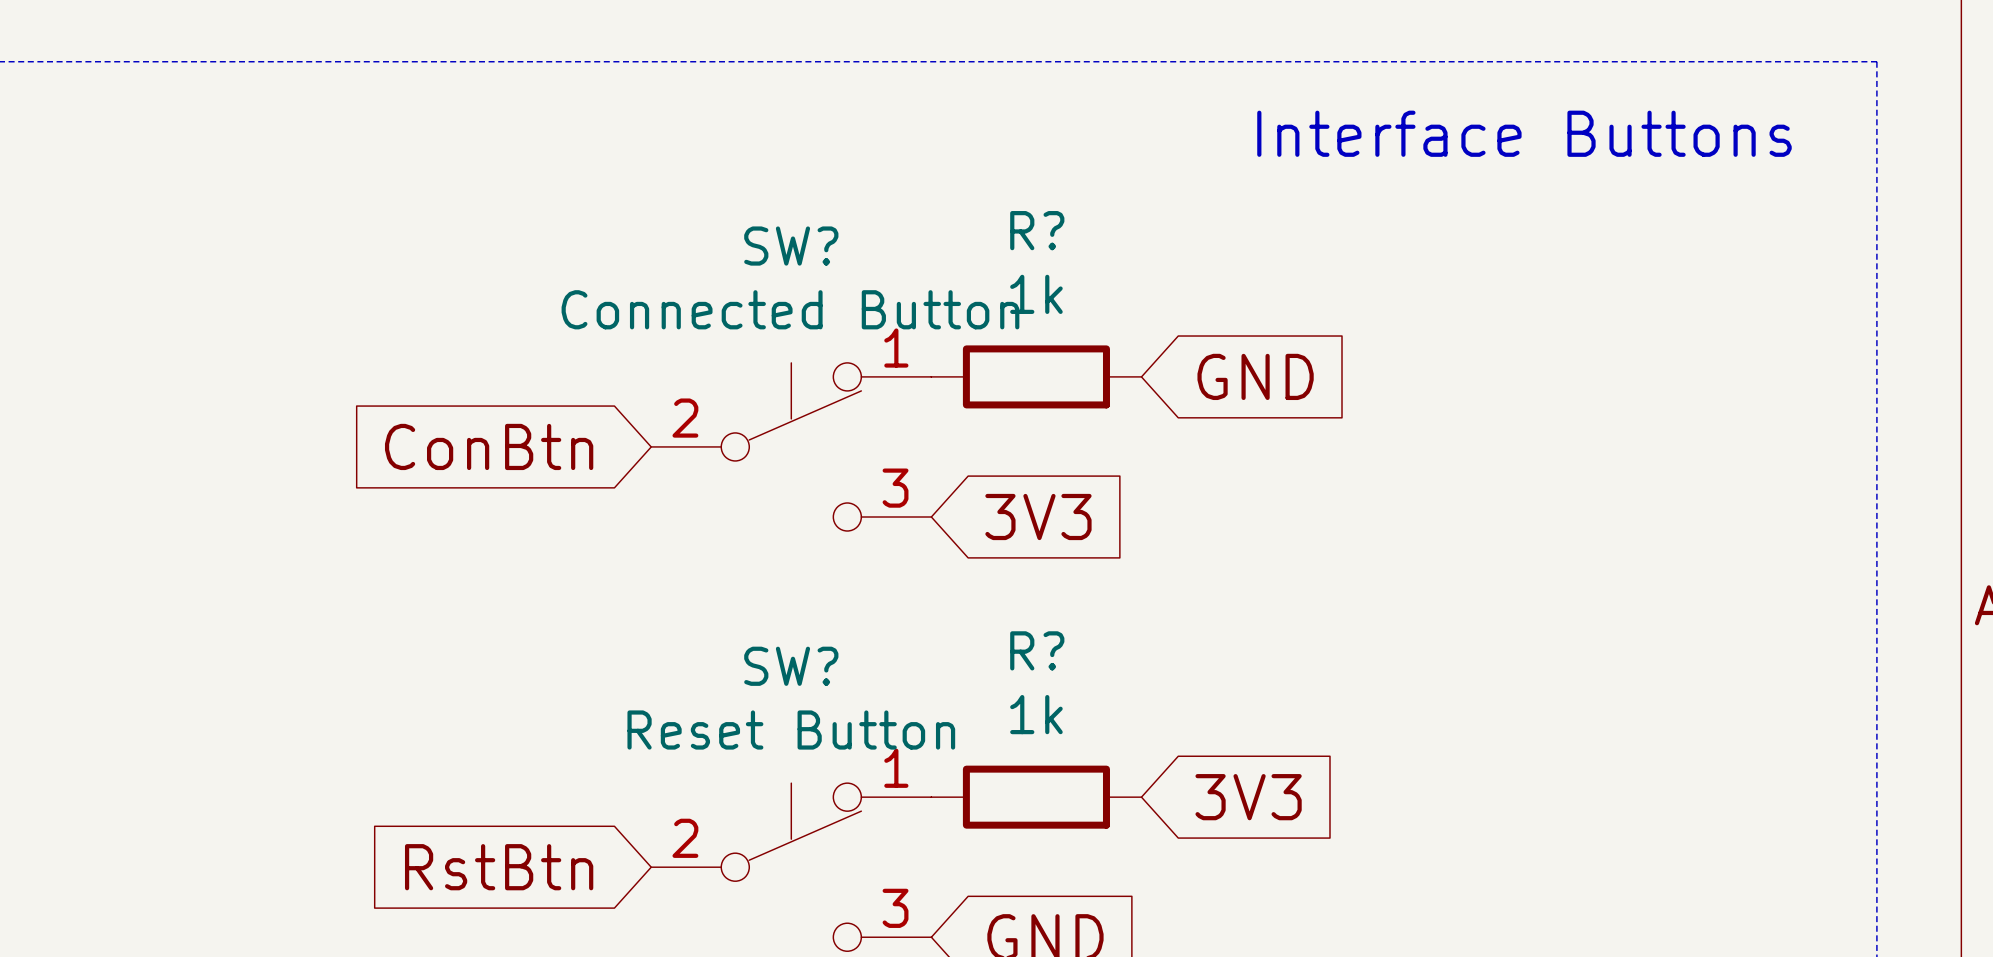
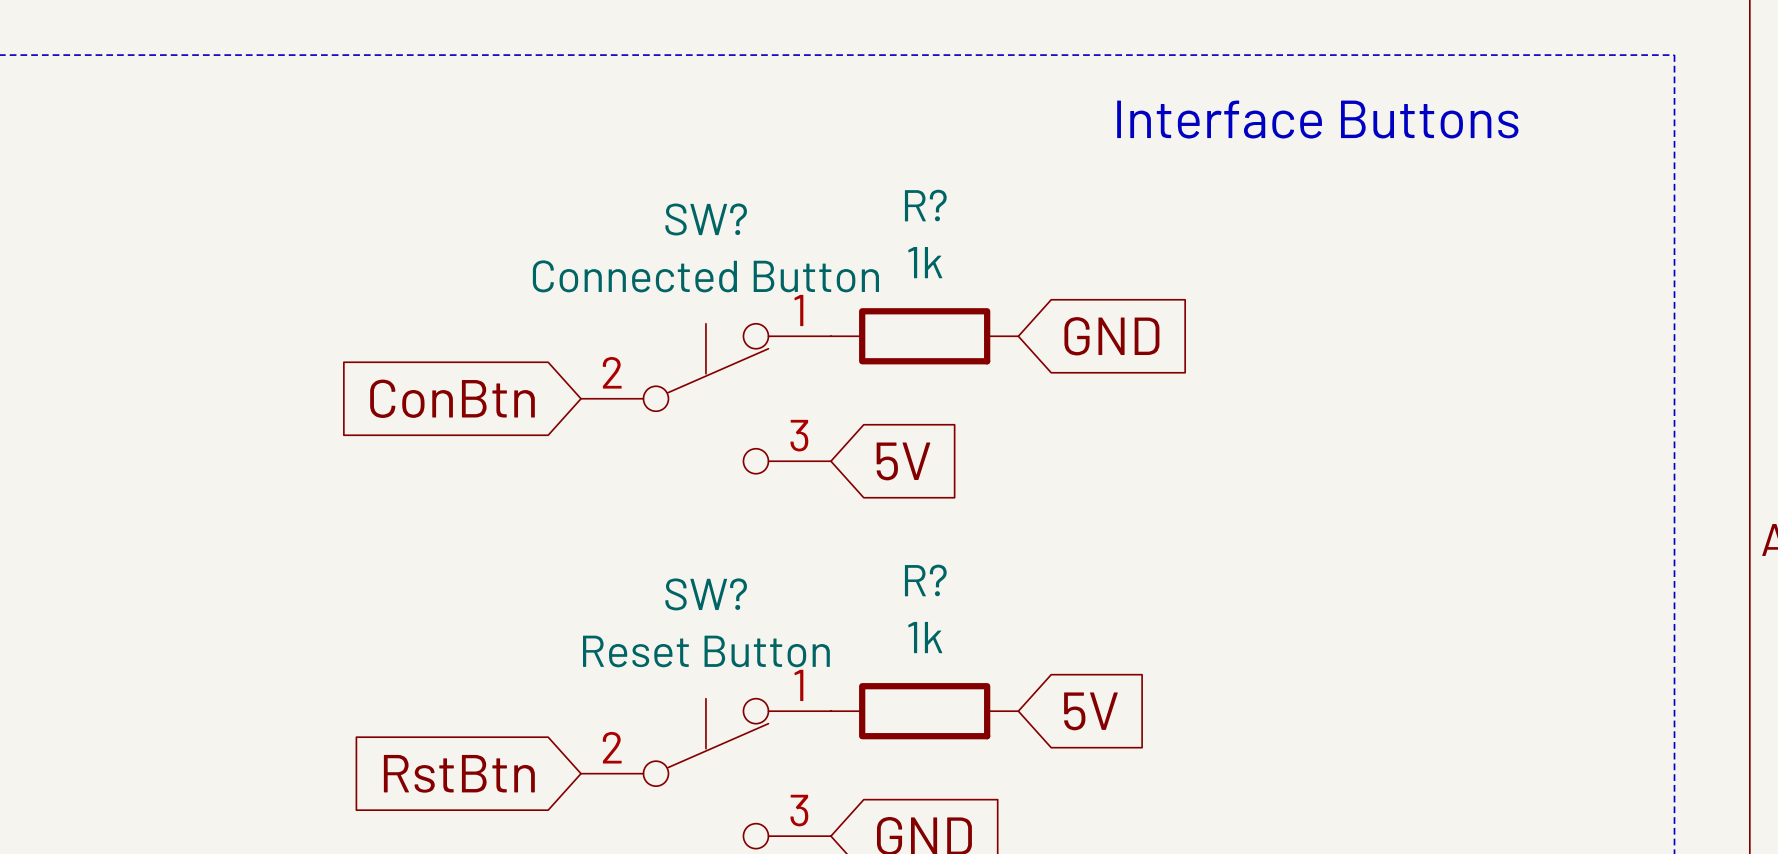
global label: 3V3 (1038, 517) -> 5V (903, 461)
global label: 3V3 (1248, 797) -> 5V (1090, 711)

